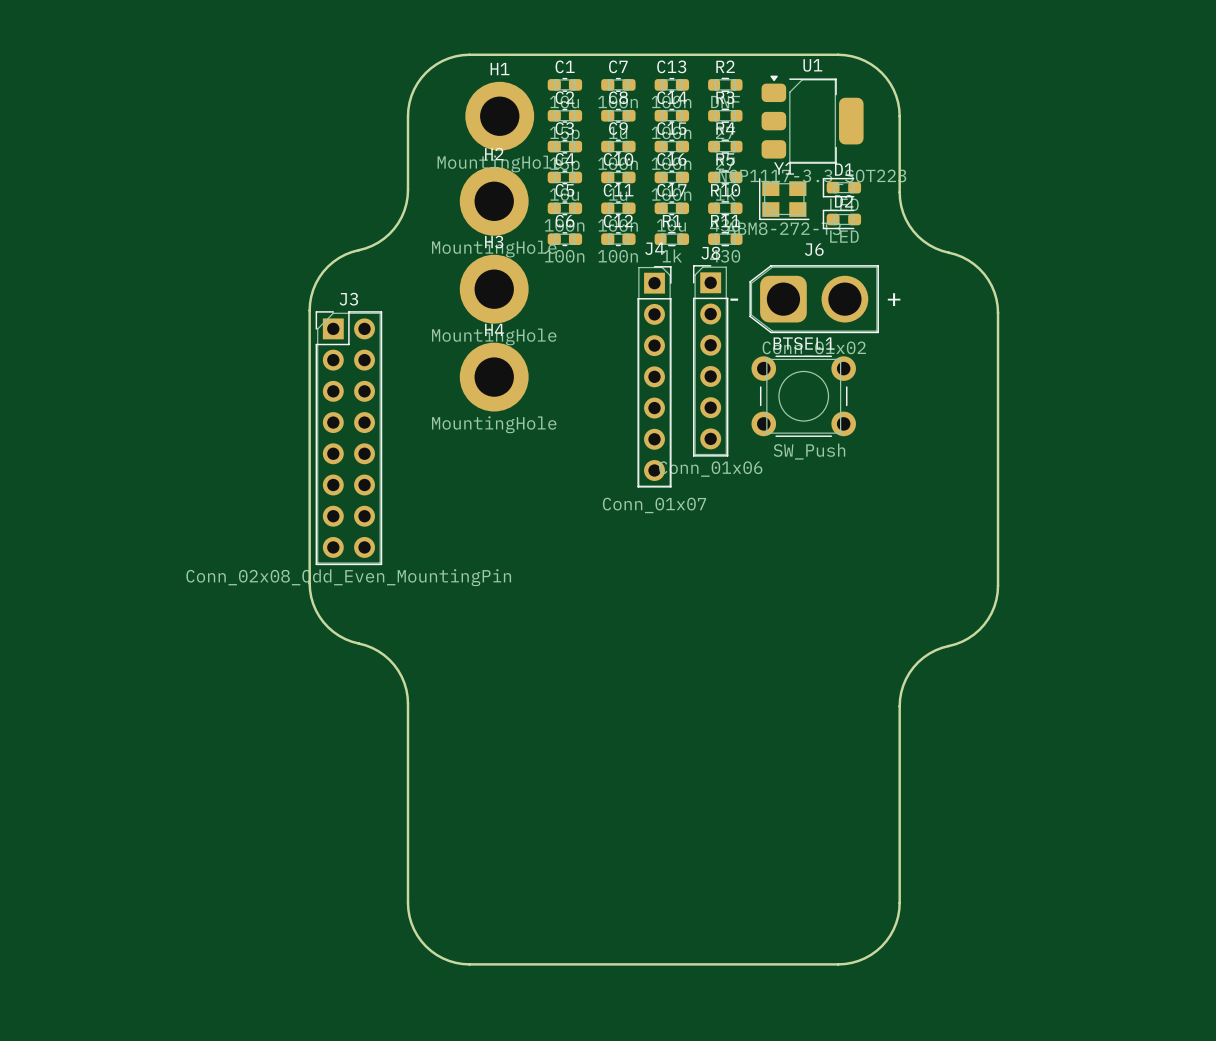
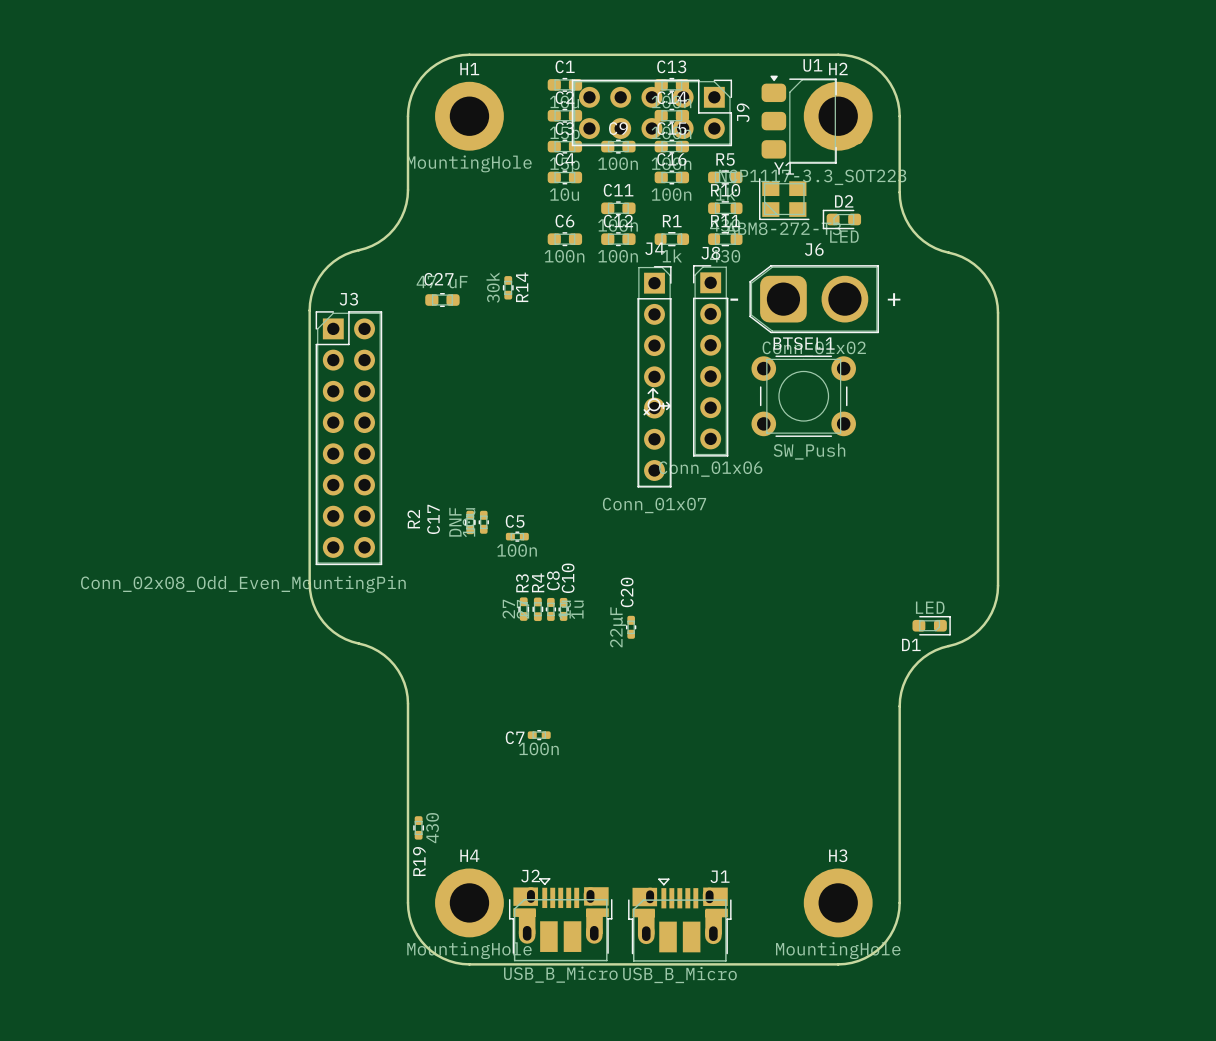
C7 name position: C7 (618, 66) -> C7 (515, 737)
R2 name position: R2 (725, 66) -> R2 (413, 519)
C7 footprint: [601, 77, 636, 92] -> [527, 729, 551, 741]
R2 footprint: [708, 77, 743, 93] -> [464, 510, 476, 535]
C8 footprint: [601, 108, 636, 123] -> [545, 597, 557, 621]
R3 footprint: [708, 108, 743, 123] -> [518, 597, 530, 621]
J9: none -> (651, 112)
H1 position: (499, 116) -> (469, 116)
R4 footprint: [708, 139, 743, 154] -> [532, 597, 544, 622]
C10 footprint: [601, 170, 636, 185] -> [558, 597, 569, 621]
D1 rotation: 0° (841, 187) -> 180° (931, 625)
D1 position: (841, 187) -> (931, 625)
C17 name position: C17 (671, 190) -> C17 (433, 519)
H2 position: (494, 201) -> (838, 116)
C5 footprint: [547, 201, 583, 216] -> [505, 531, 529, 542]
C17 footprint: [654, 201, 690, 216] -> [478, 510, 489, 534]
H2 value: MountingHole (494, 248) -> none
R14: none -> 30k (508, 287)
H3 position: (494, 289) -> (838, 902)
C27: none -> 47 uF (442, 300)
H4 position: (494, 377) -> (469, 902)
drawing: none -> [643, 387, 672, 416]
J3 value position: Conn_02x08_Odd_Even_MountingPin (348, 577) -> Conn_02x08_Odd_Even_MountingPin (243, 584)
C20: none -> 22μF (631, 627)
R19: none -> 430 (418, 827)
J2: none -> USB_B_Micro (560, 919)
J1: none -> USB_B_Micro (679, 920)

